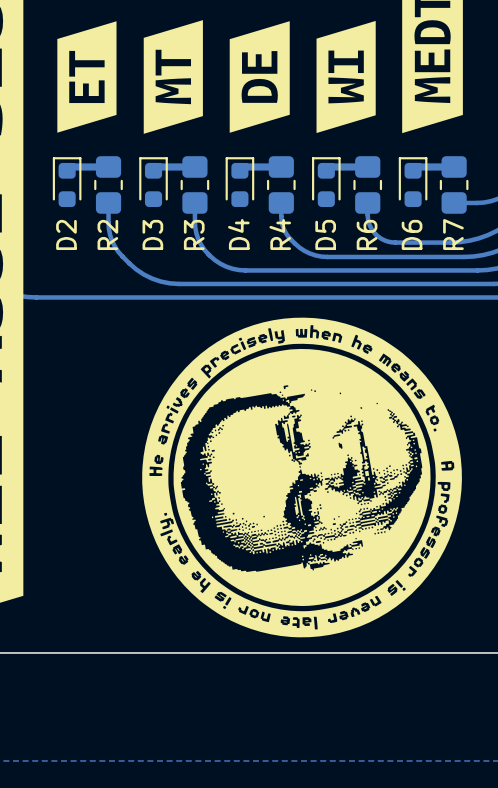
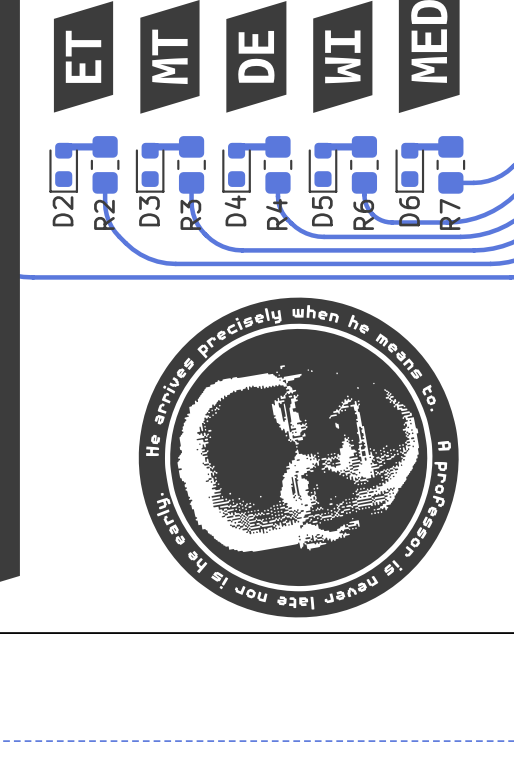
D2 rotation: 0° (67, 182) -> 180° (63, 167)
D3 rotation: 0° (153, 182) -> 180° (150, 167)
D4 rotation: 0° (239, 182) -> 180° (236, 167)
D5 rotation: 0° (326, 182) -> 180° (323, 167)
D6 rotation: 0° (413, 182) -> 180° (409, 167)

